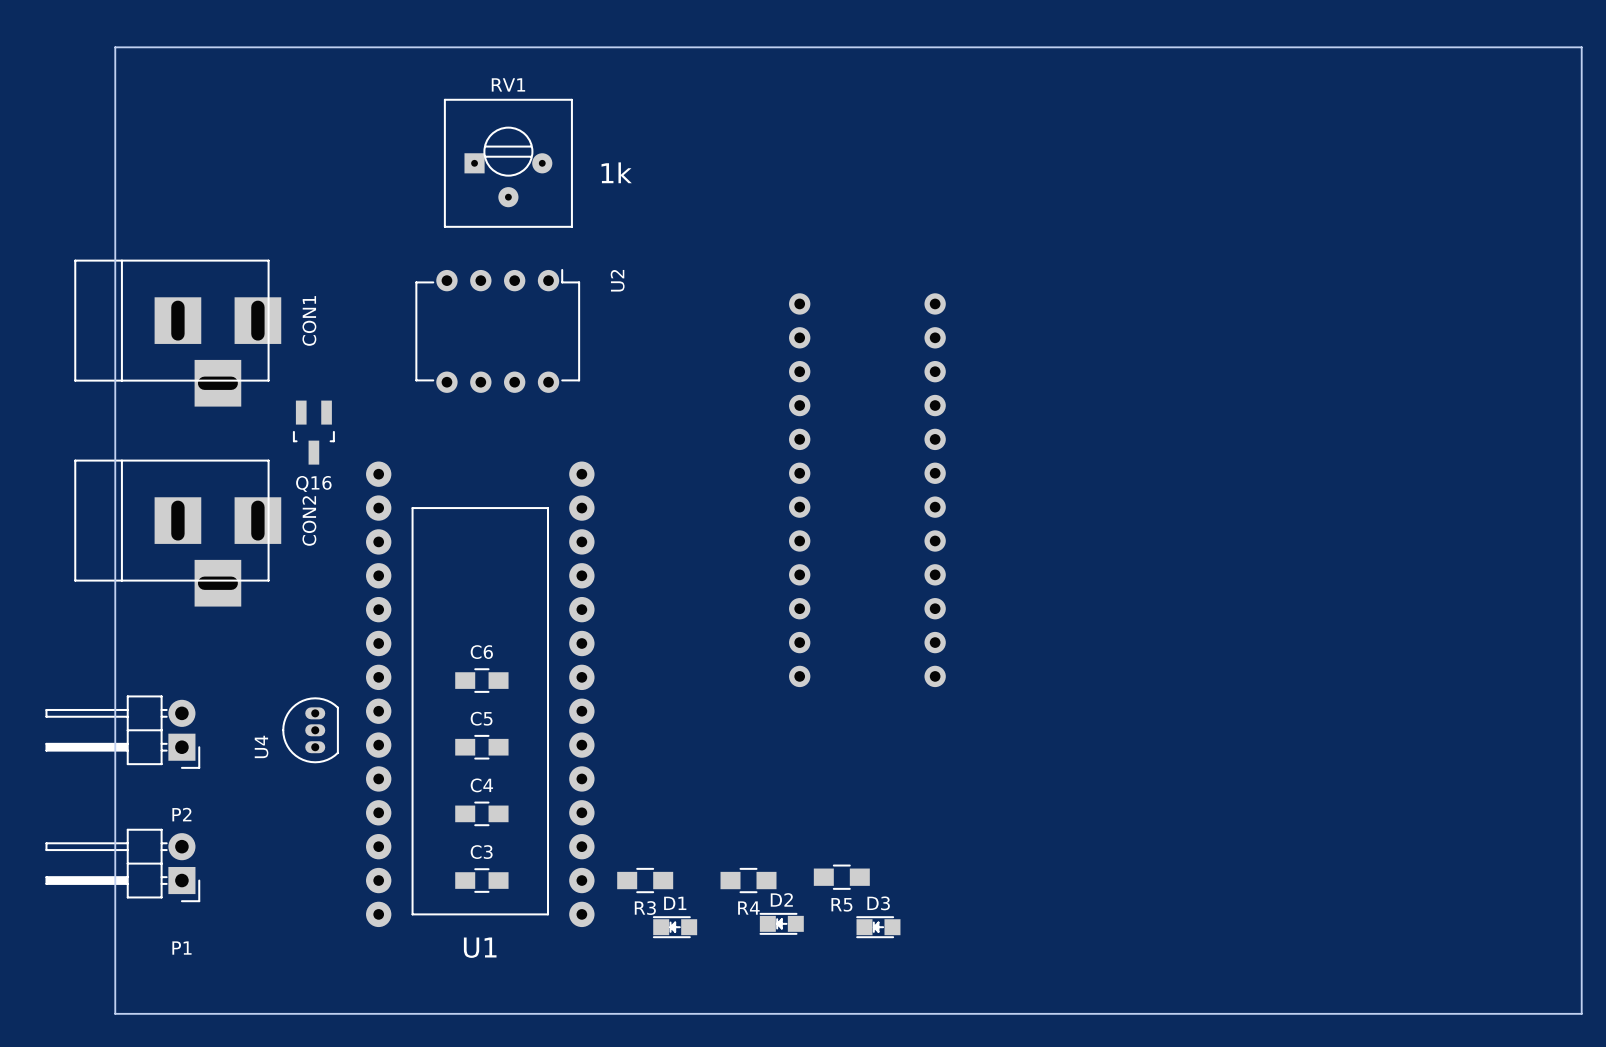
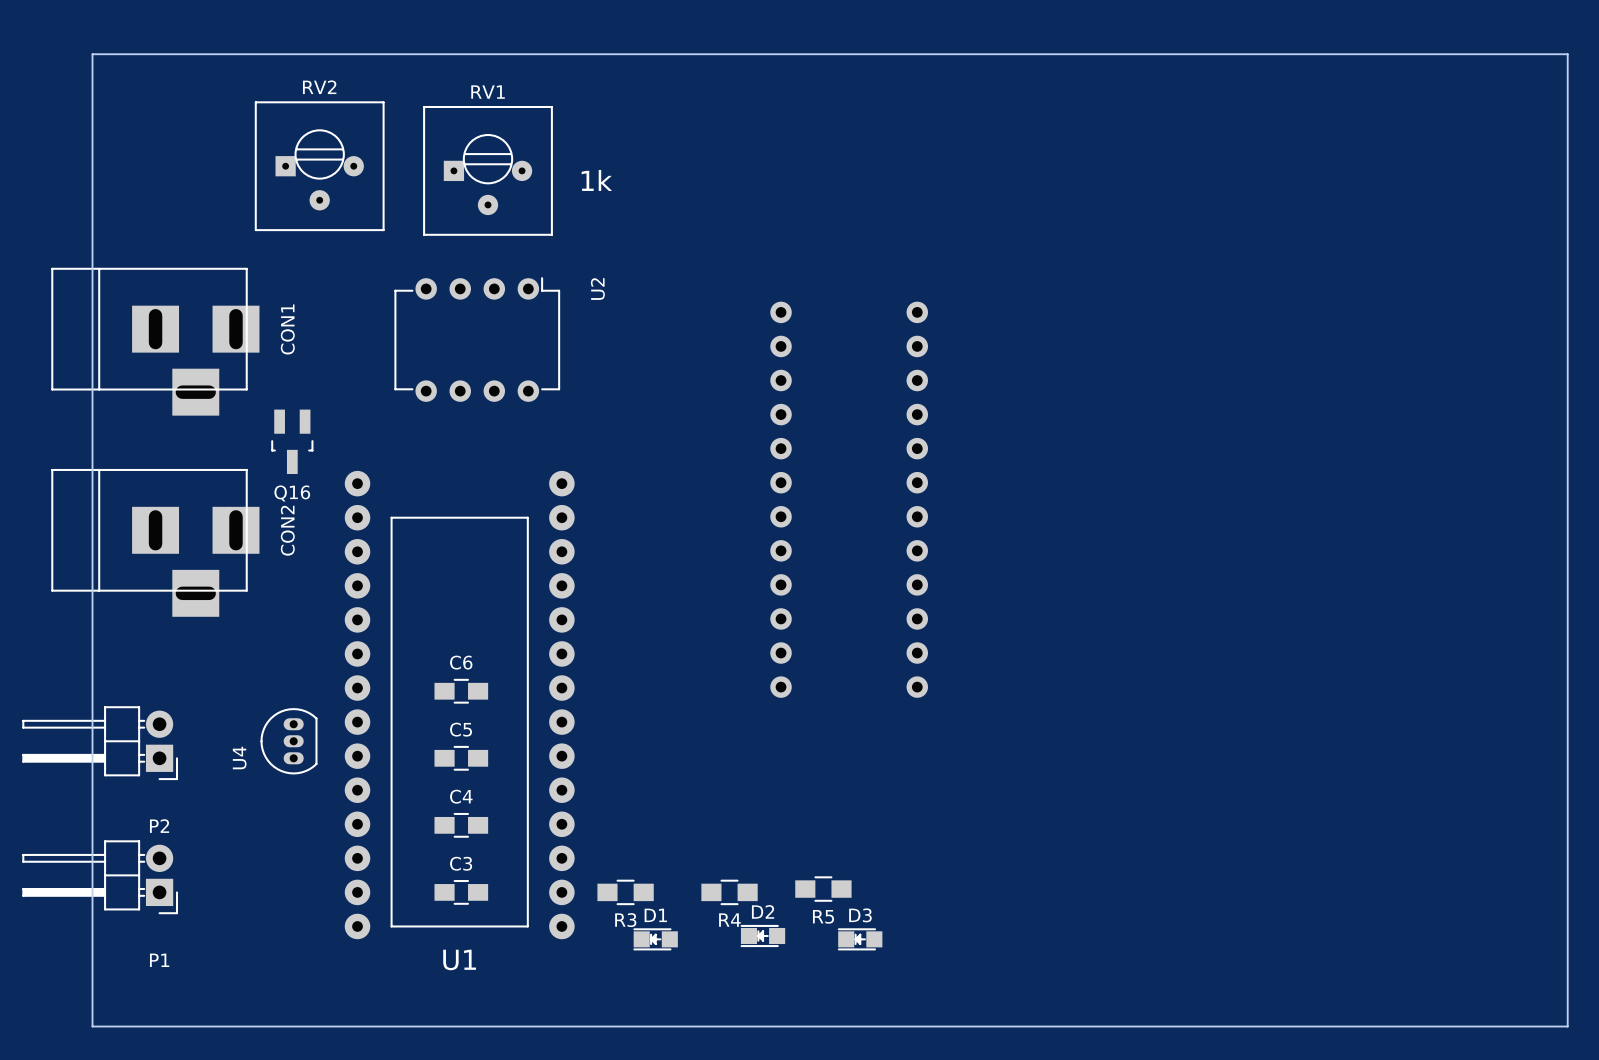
RV2: none -> (319, 166)

